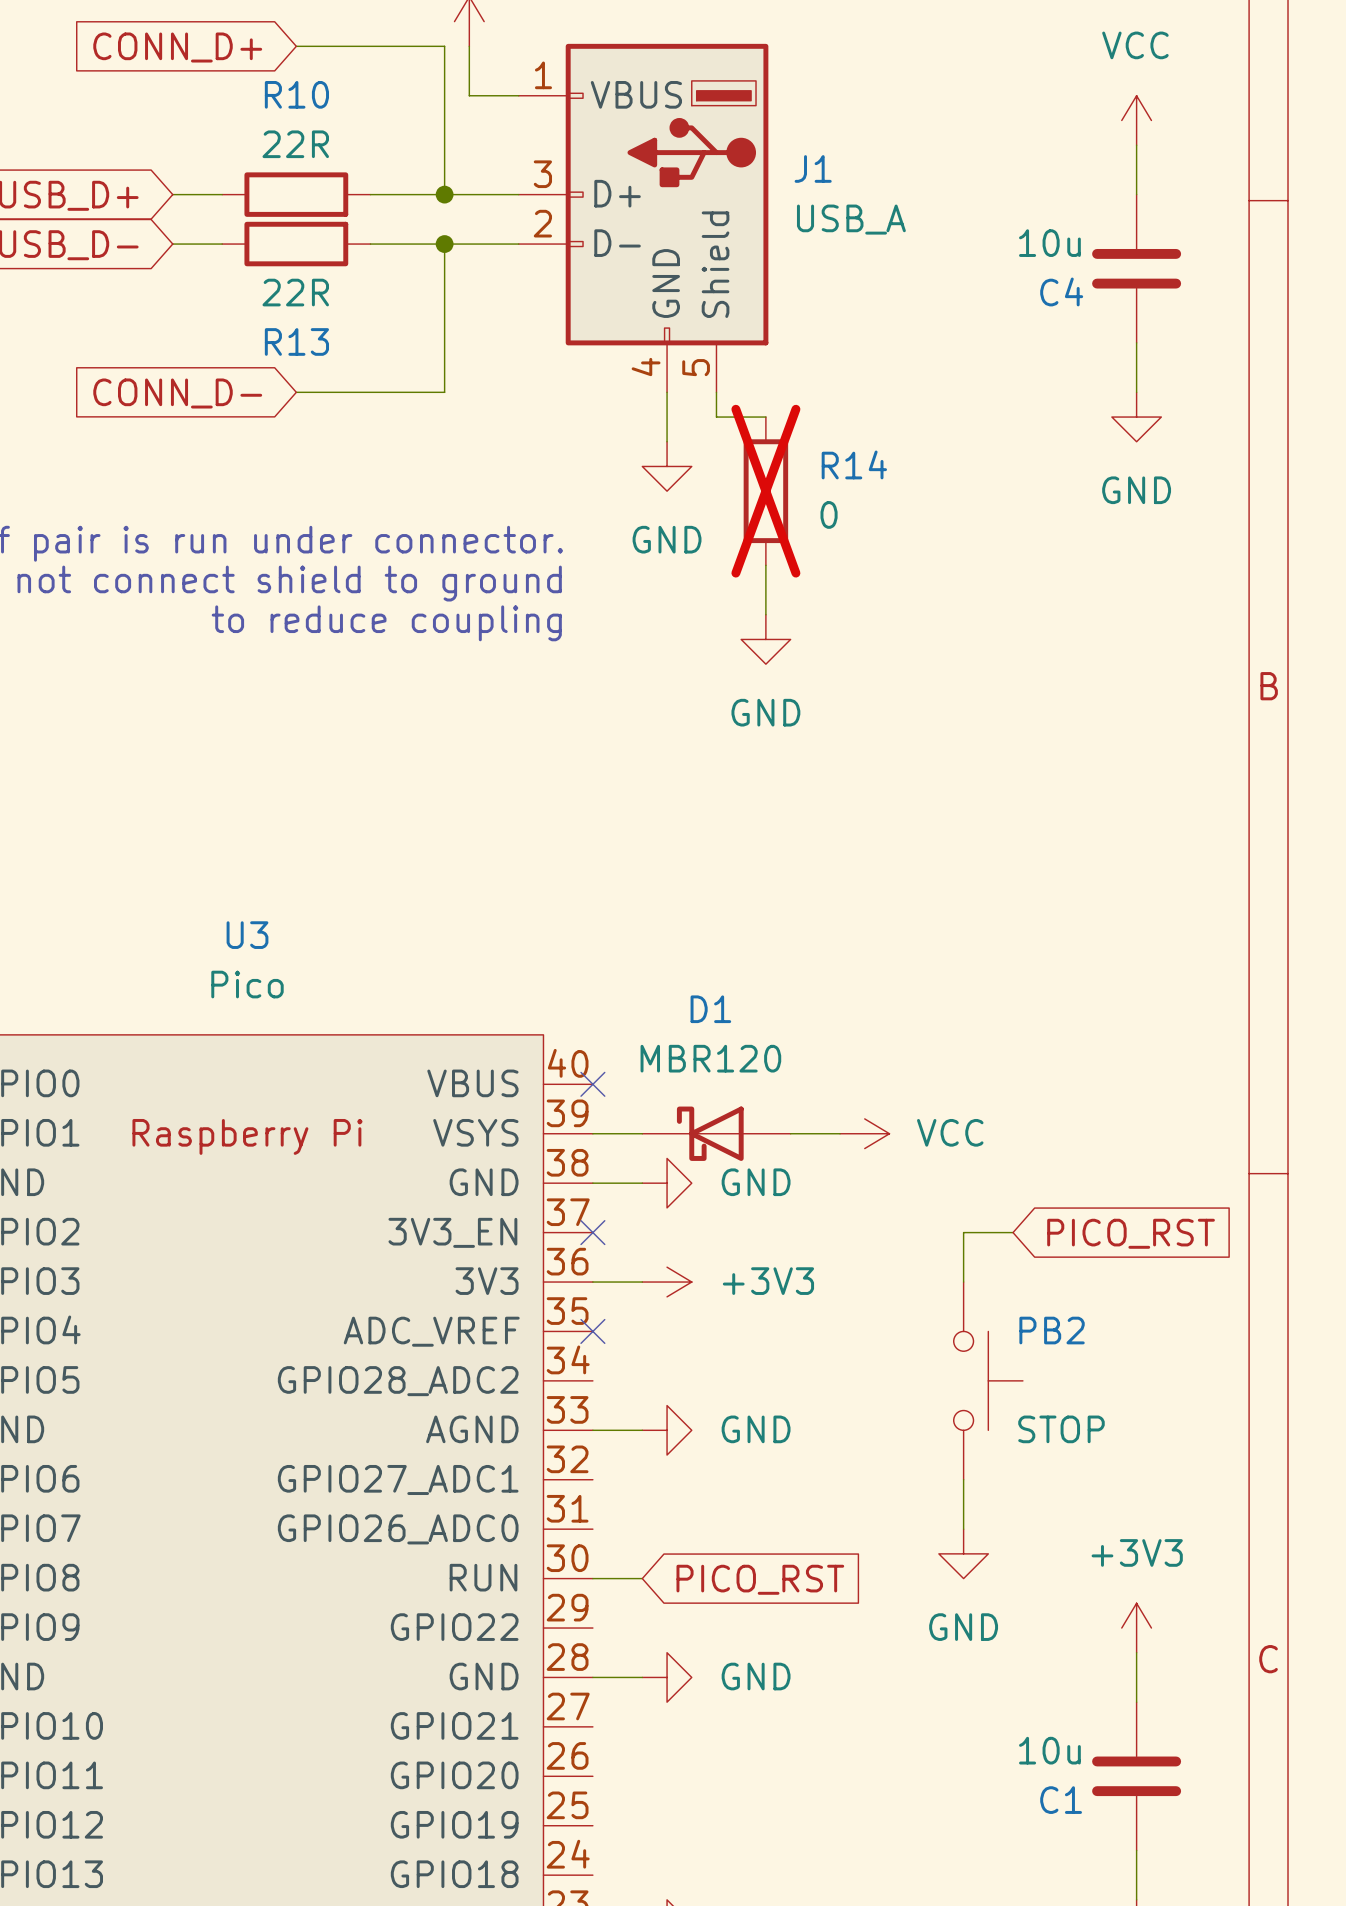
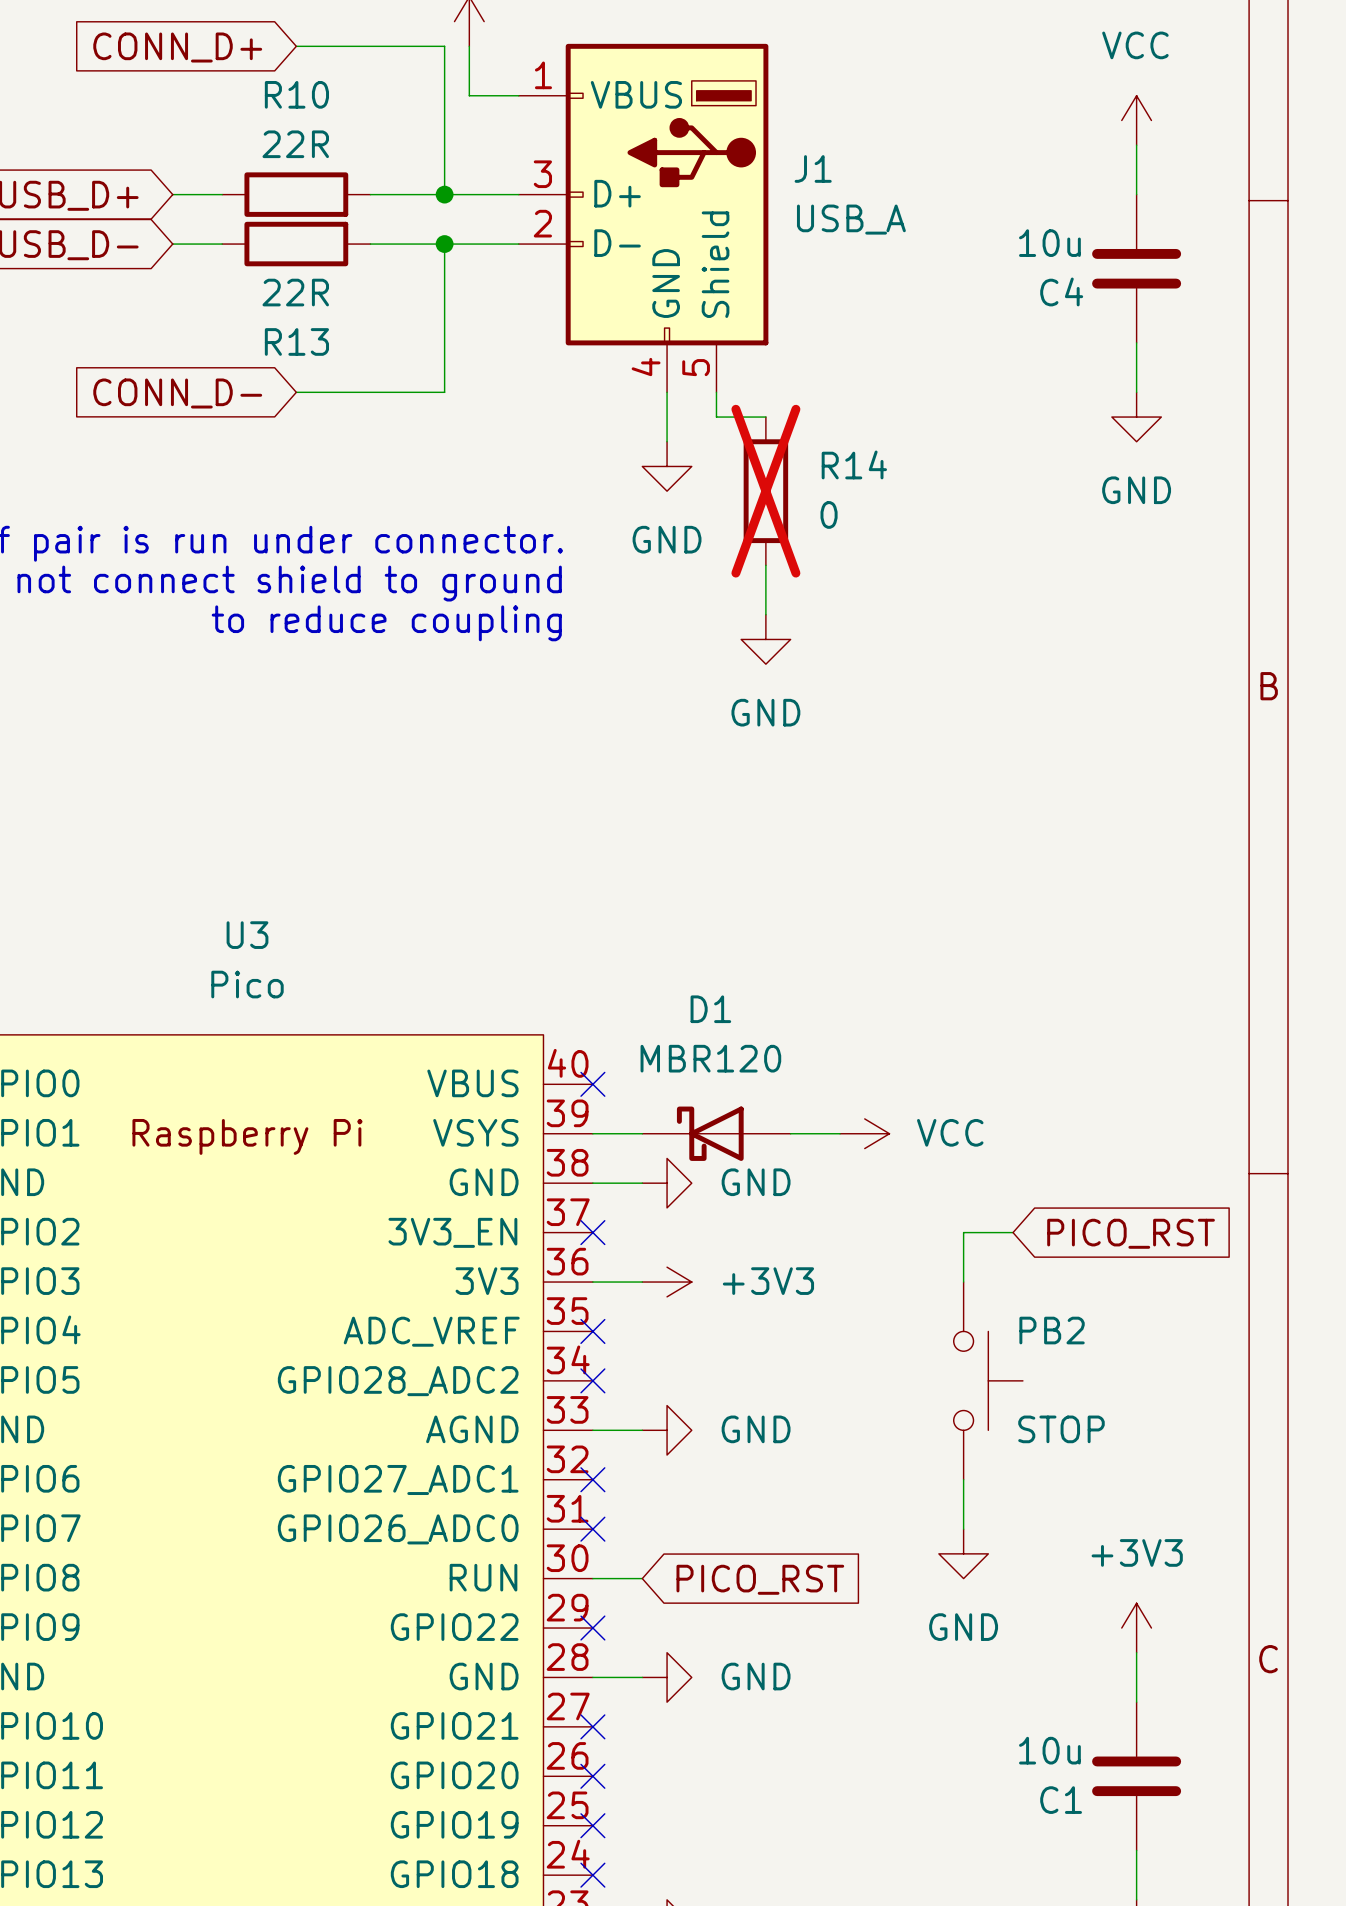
no-connect mark: none -> (592, 1380)
no-connect mark: none -> (592, 1479)
no-connect mark: none -> (592, 1529)
no-connect mark: none -> (592, 1628)
no-connect mark: none -> (592, 1726)
no-connect mark: none -> (592, 1776)
no-connect mark: none -> (592, 1825)
no-connect mark: none -> (592, 1875)

